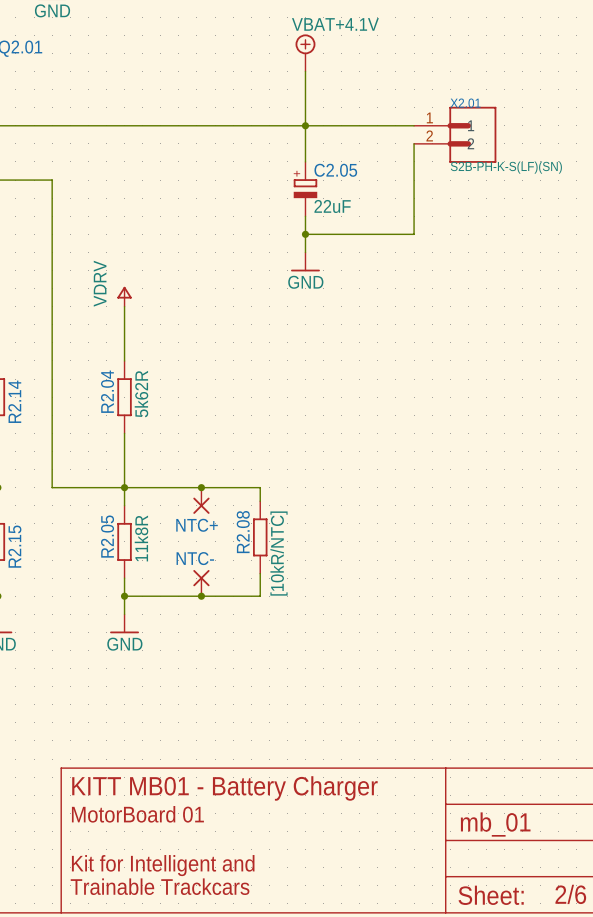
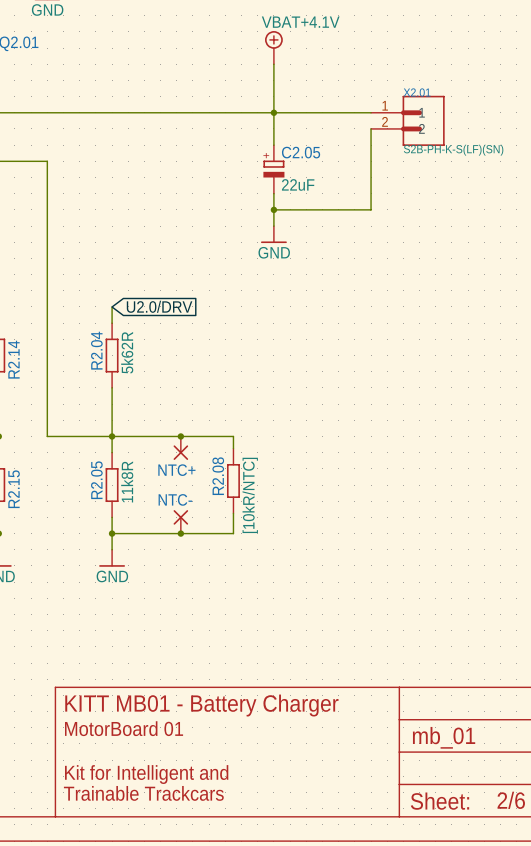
power symbol: VDRV (124, 296) -> none
wire: (124, 306) (124, 342) -> none
global label: none -> U2.0/DRV (159, 306)

